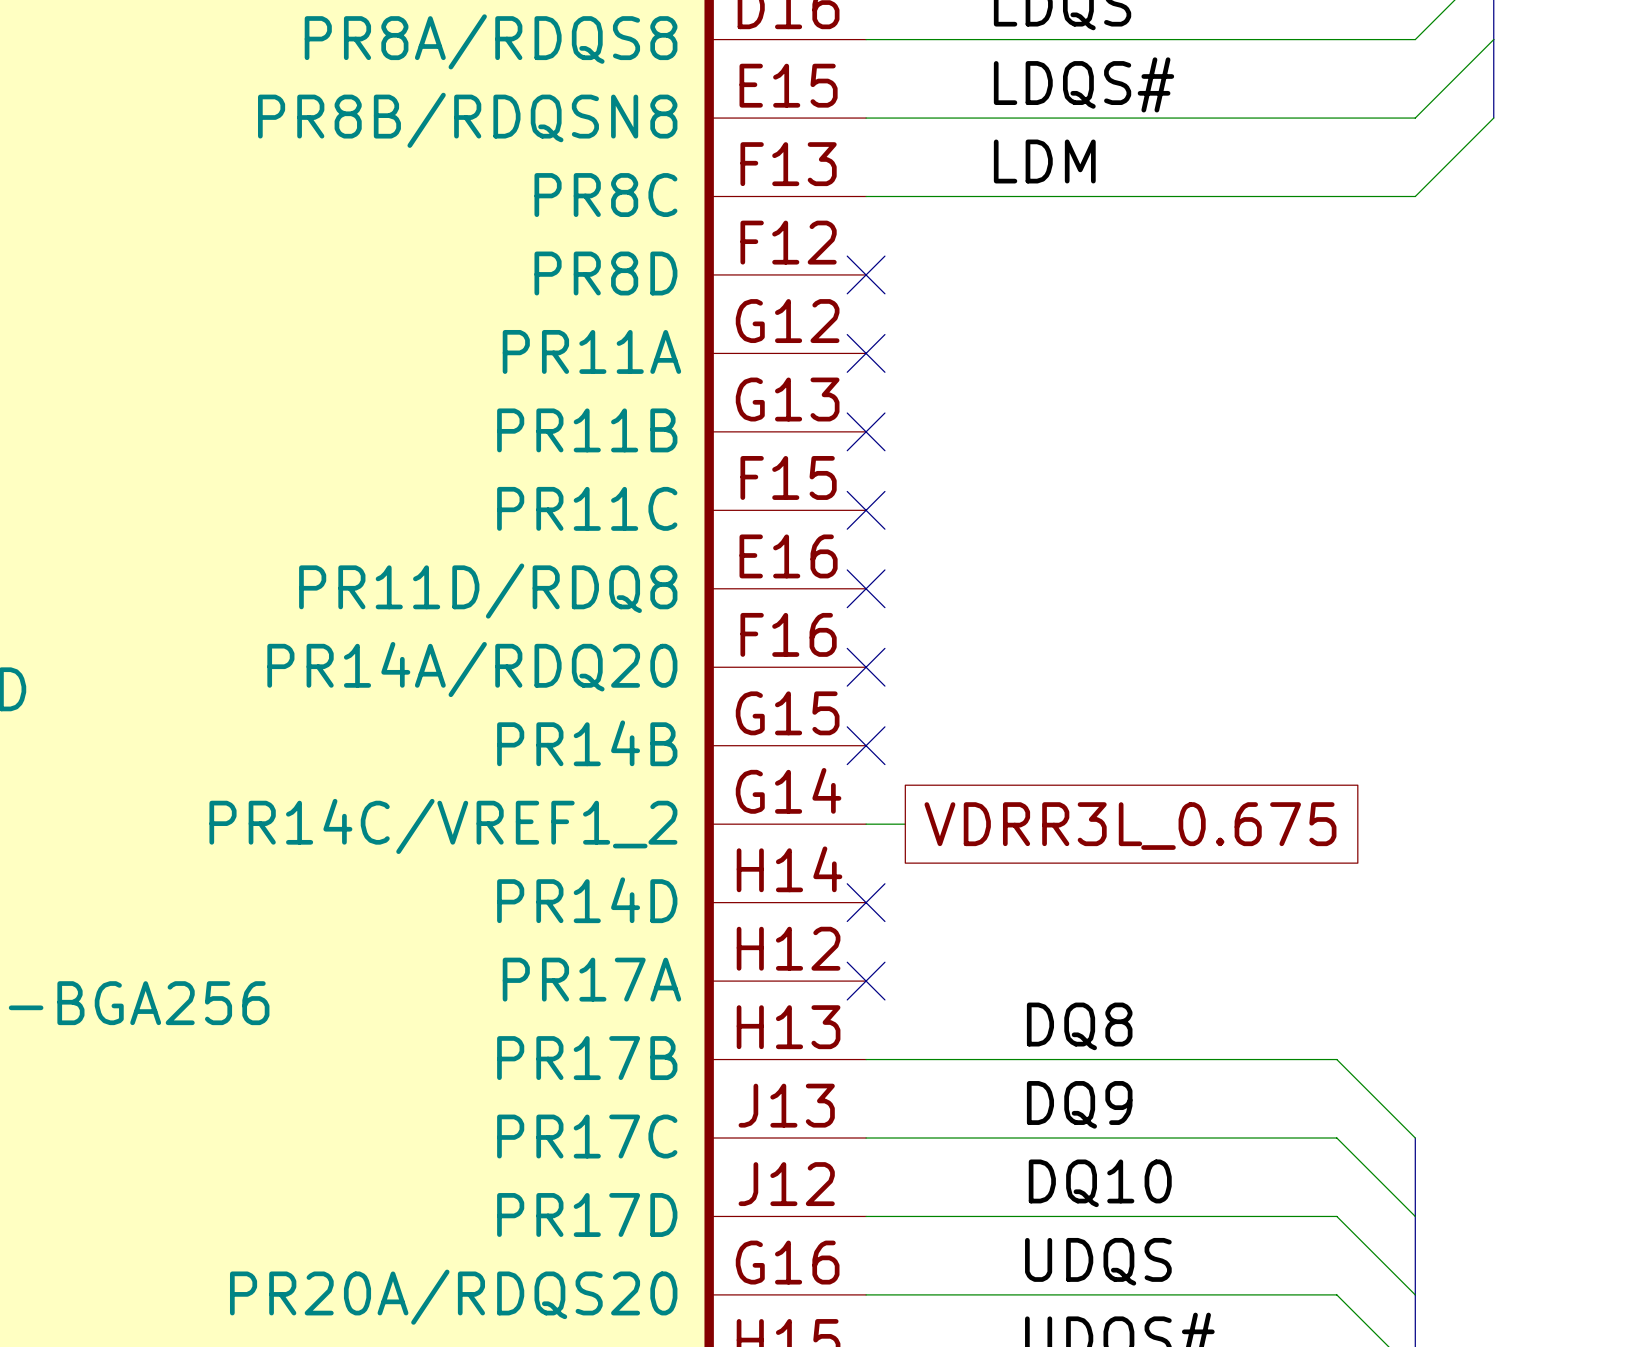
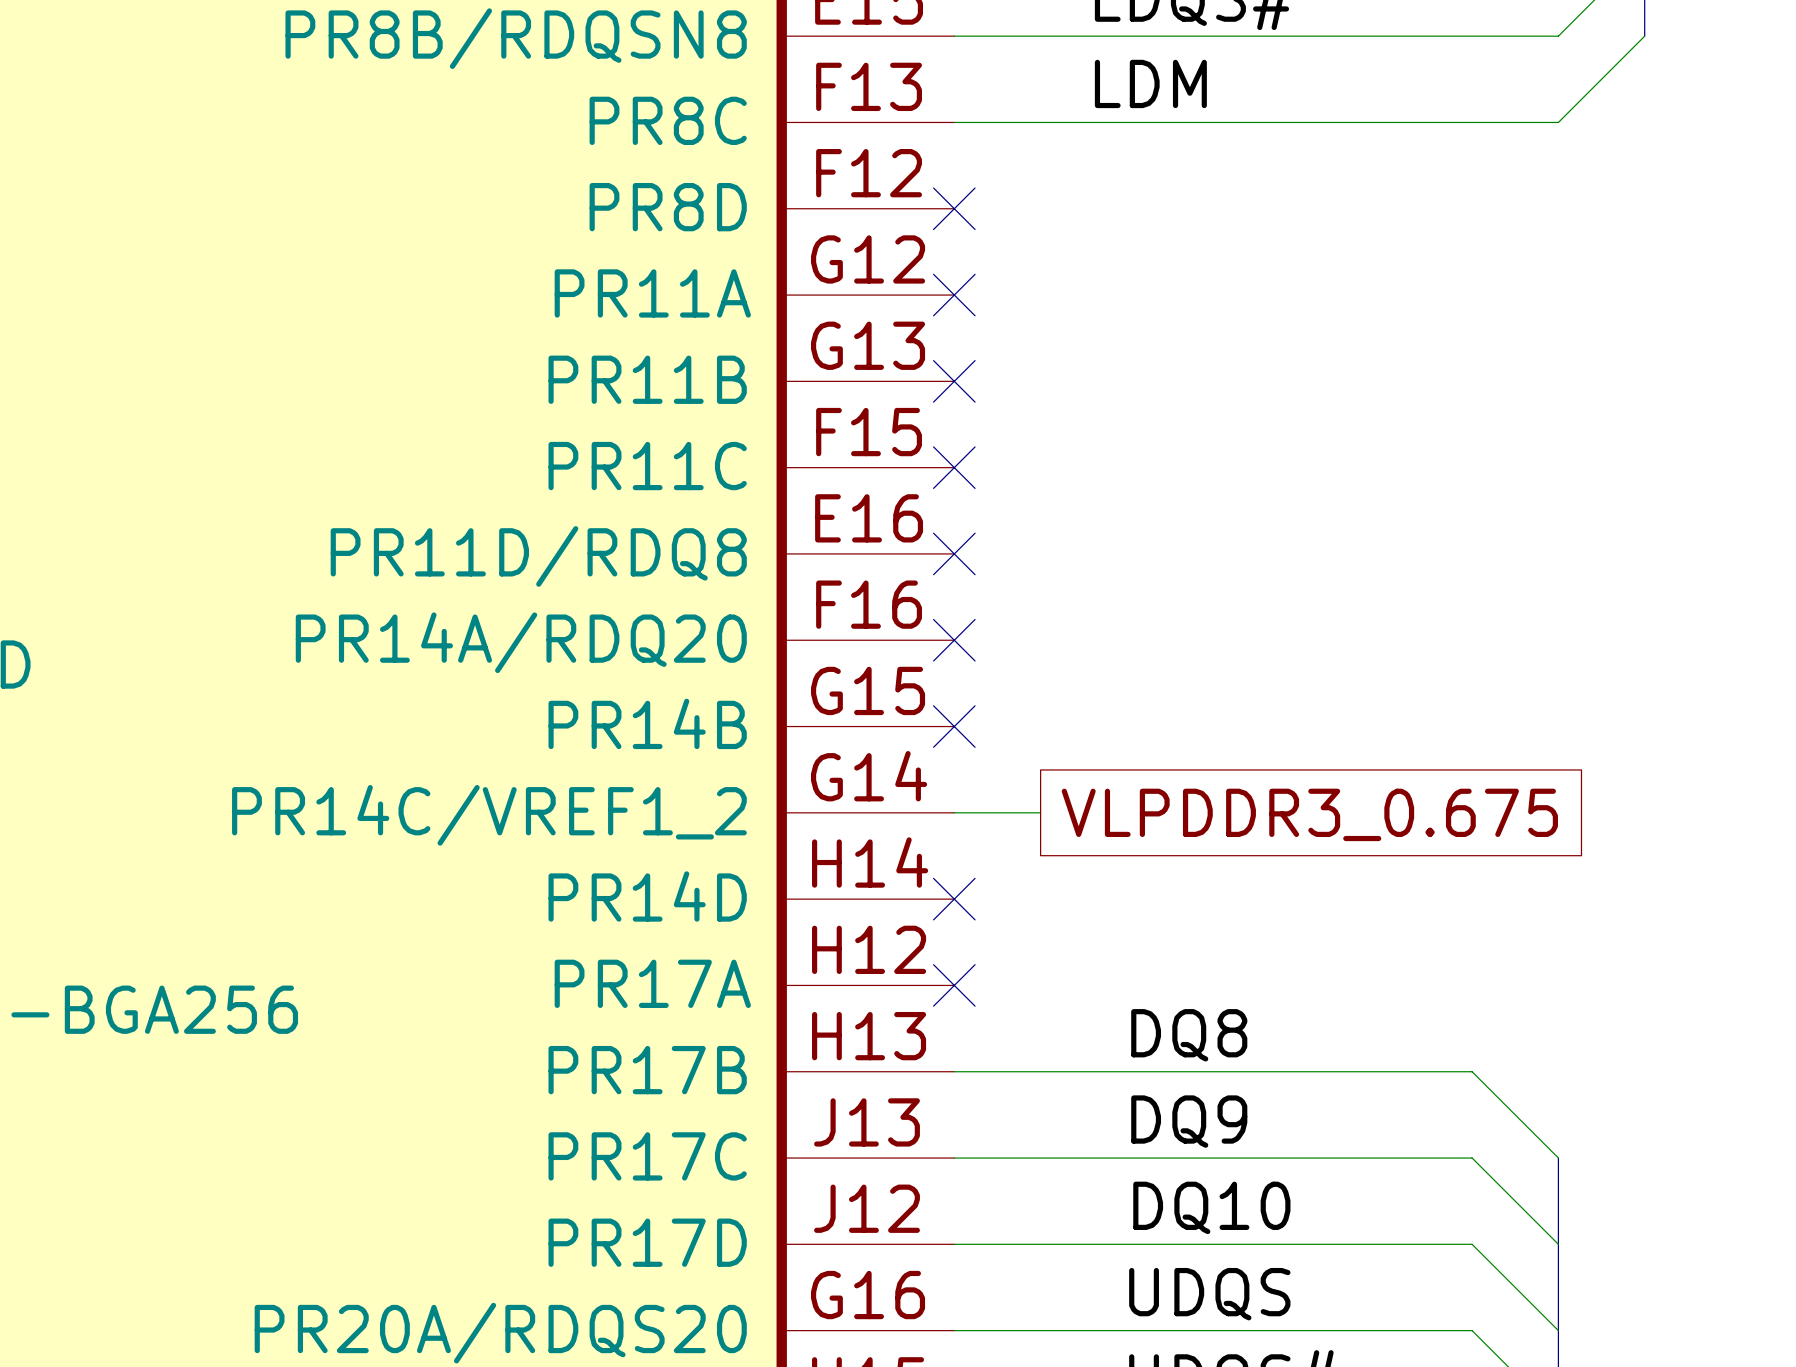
wire: none -> (997, 812) (1040, 812)
global label: VDRR3L_0.675 (1130, 826) -> VLPDDR3_0.675 (1309, 814)

